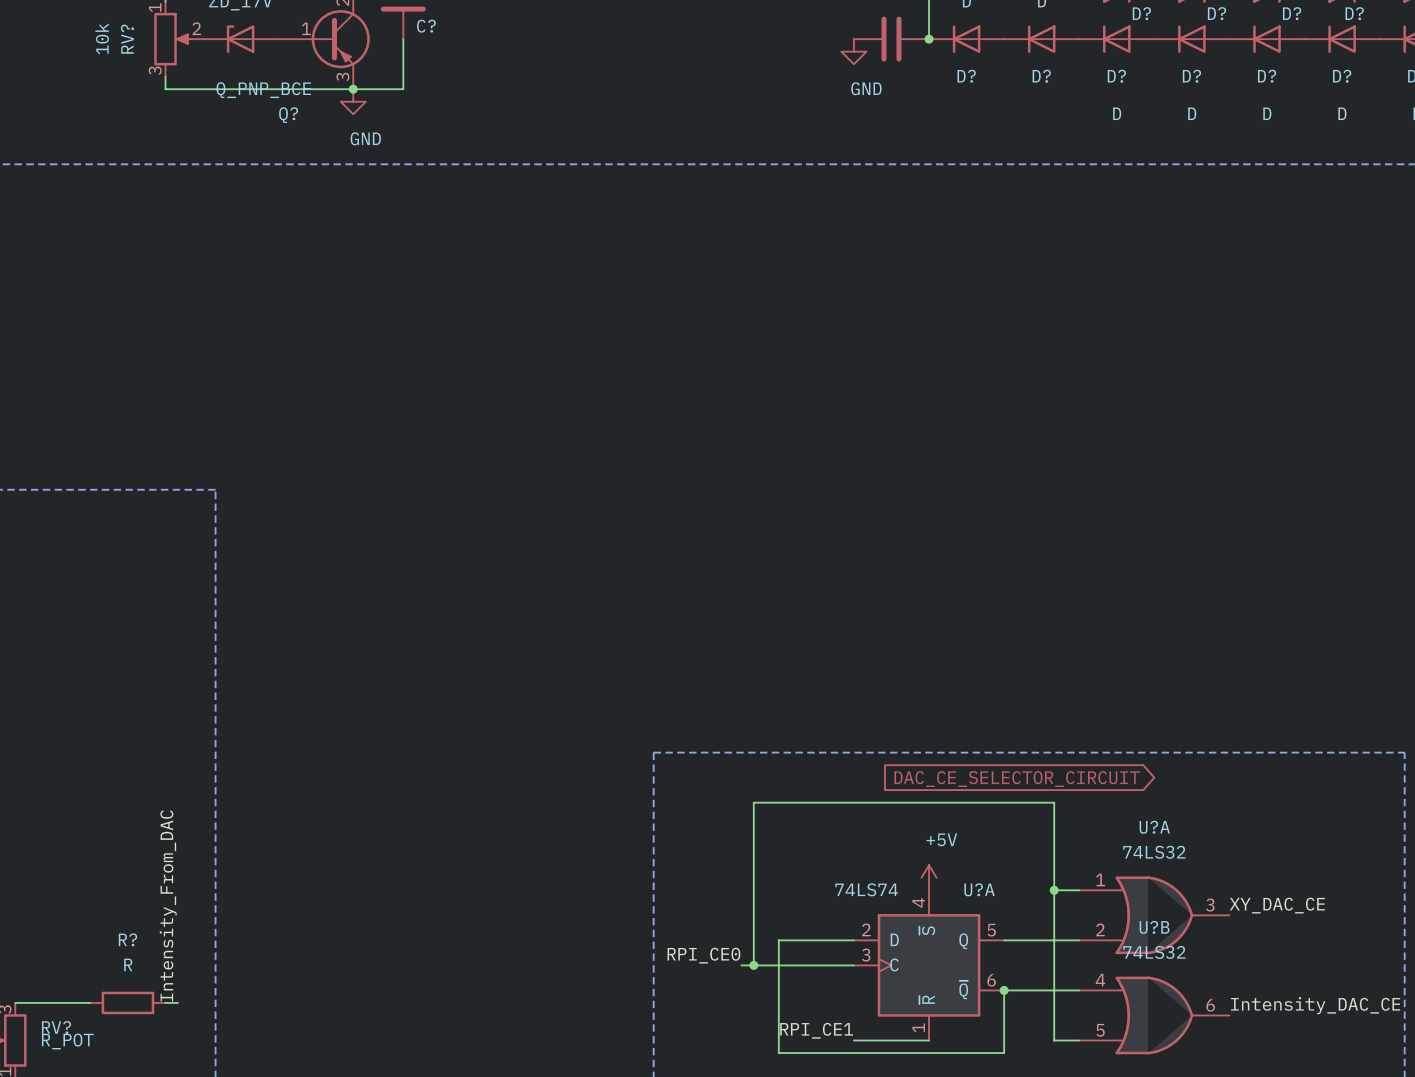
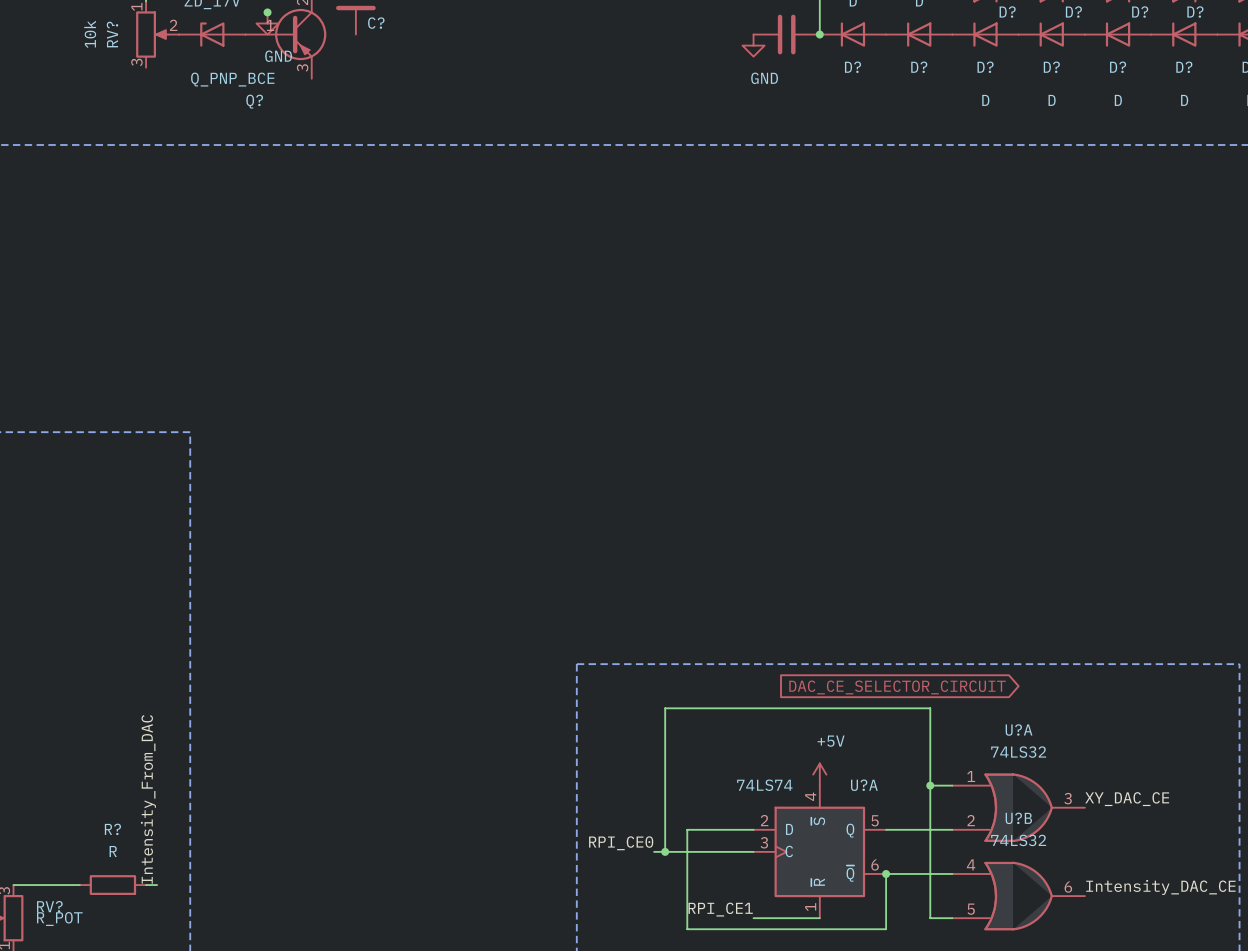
junction: none -> (267, 12)
wire: (403, 39) (403, 89) (165, 89) (165, 76) -> none
junction: (353, 89) -> none
power symbol position: GND (353, 101) -> GND (267, 23)

